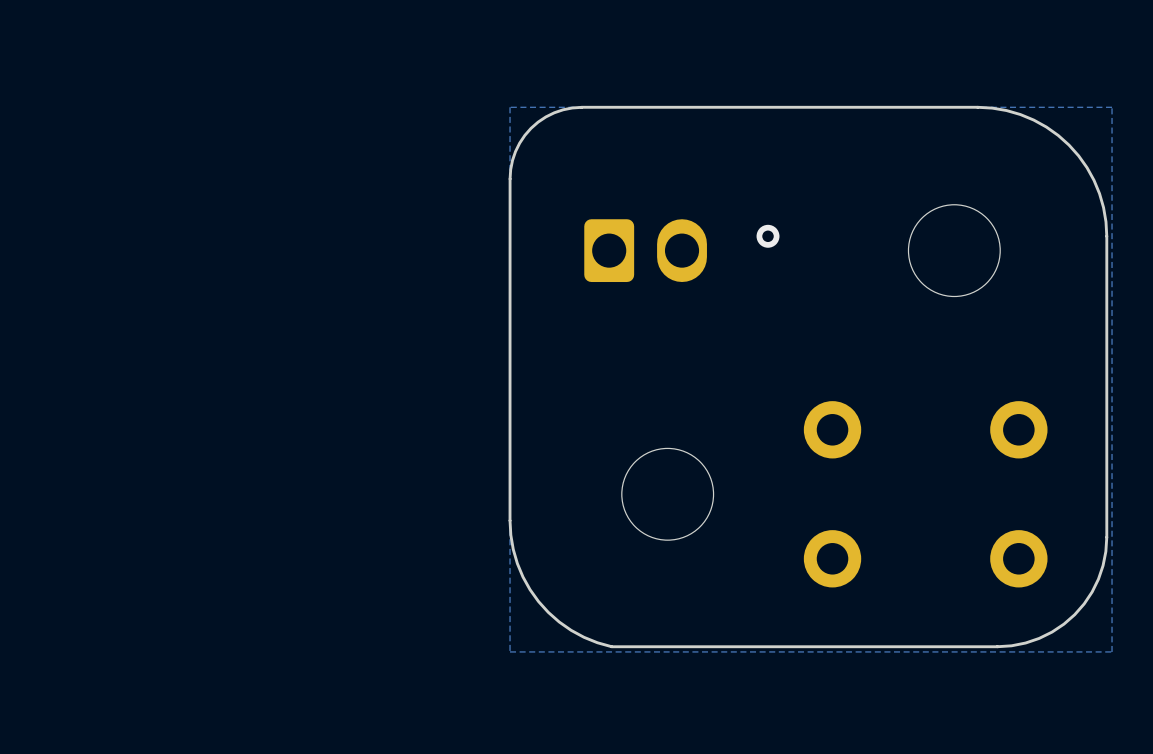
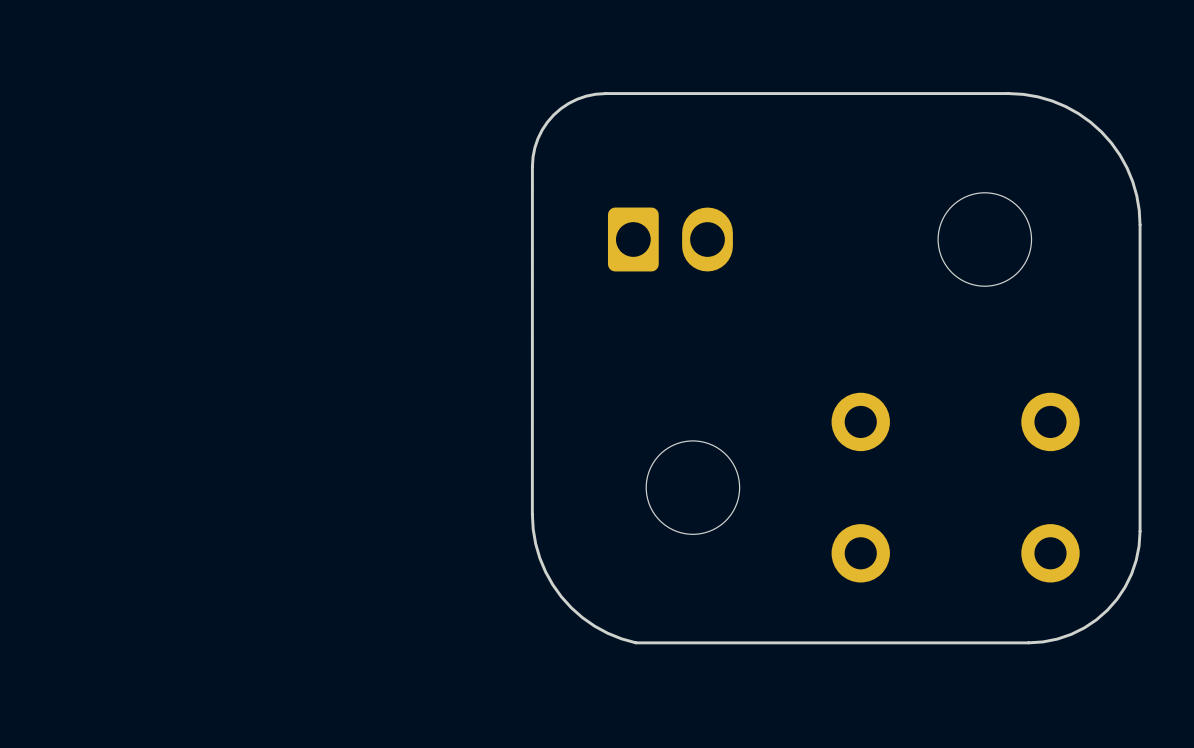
zone outline: (1112, 107) (510, 107) (510, 651) (1112, 651) (1112, 107) -> none
via: (768, 236) -> none

